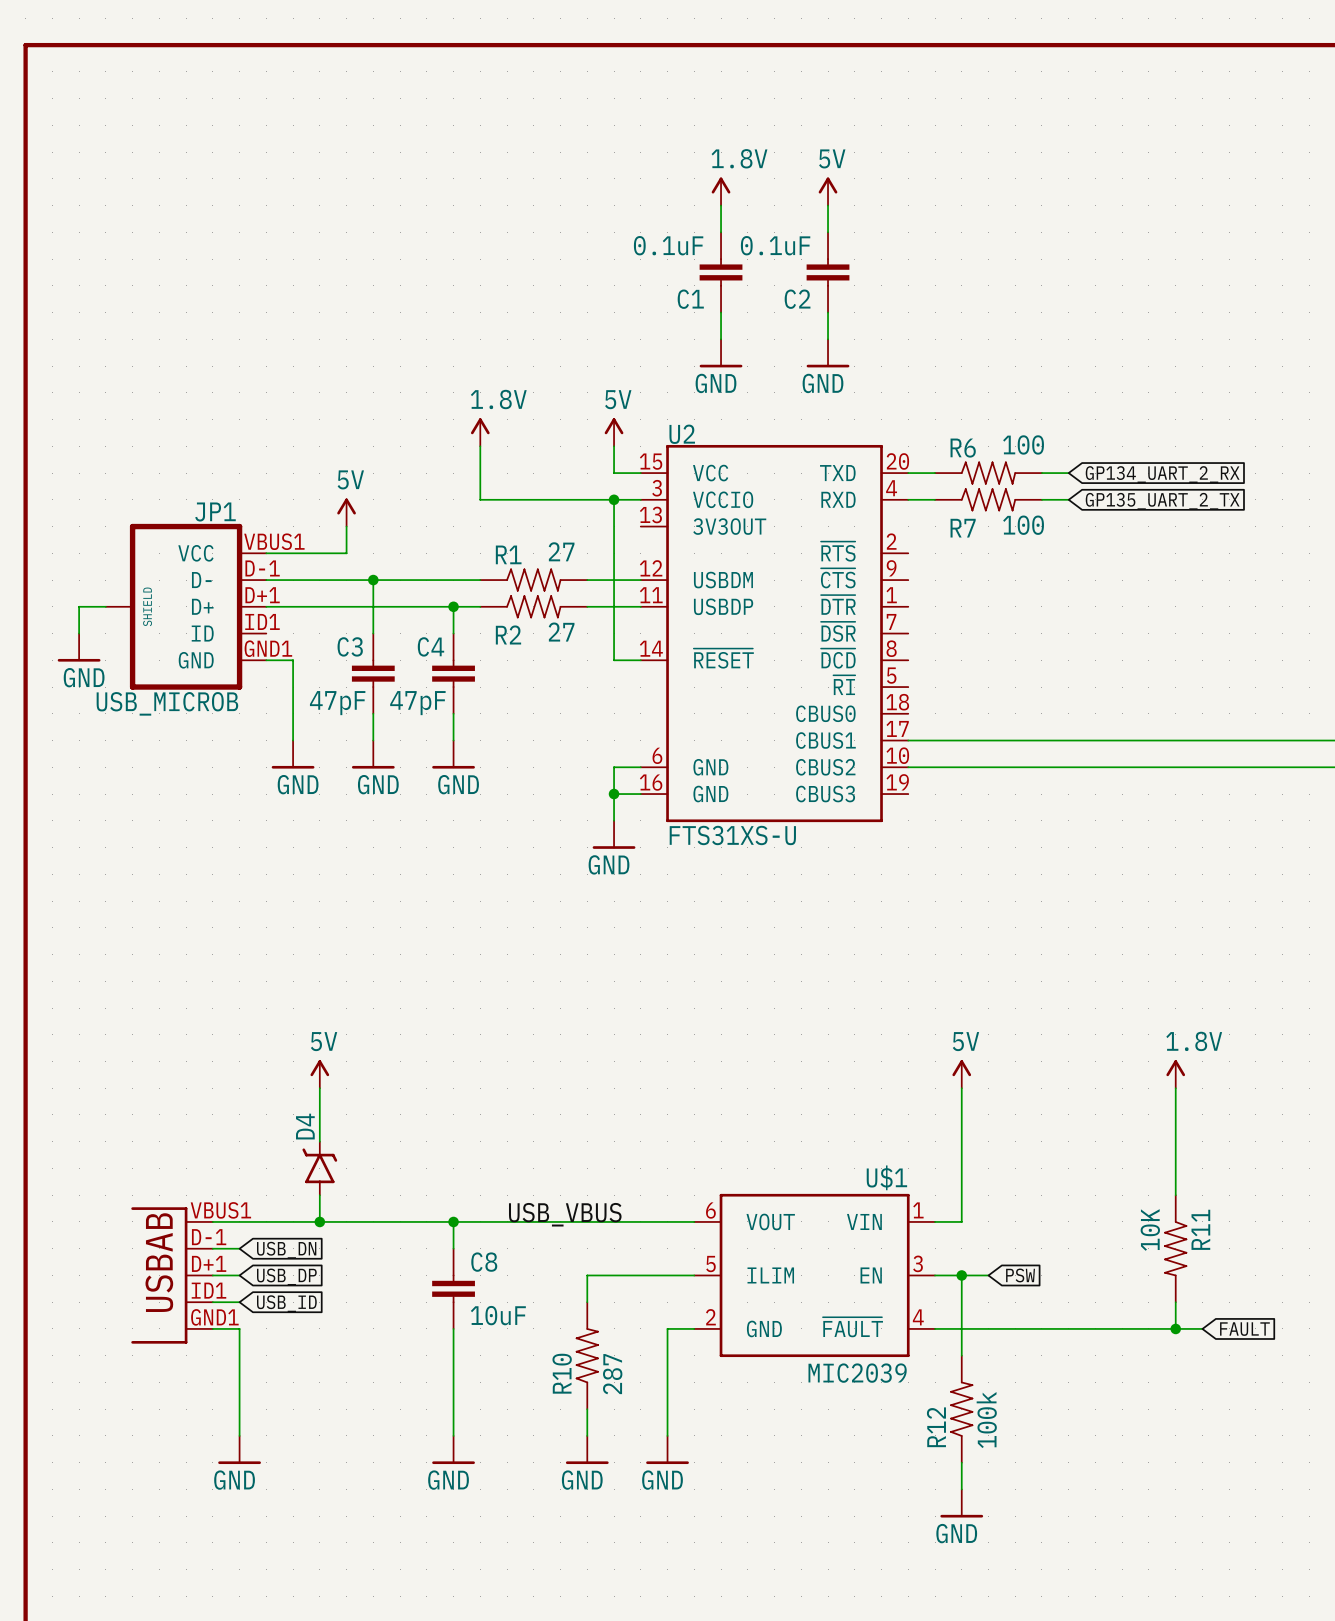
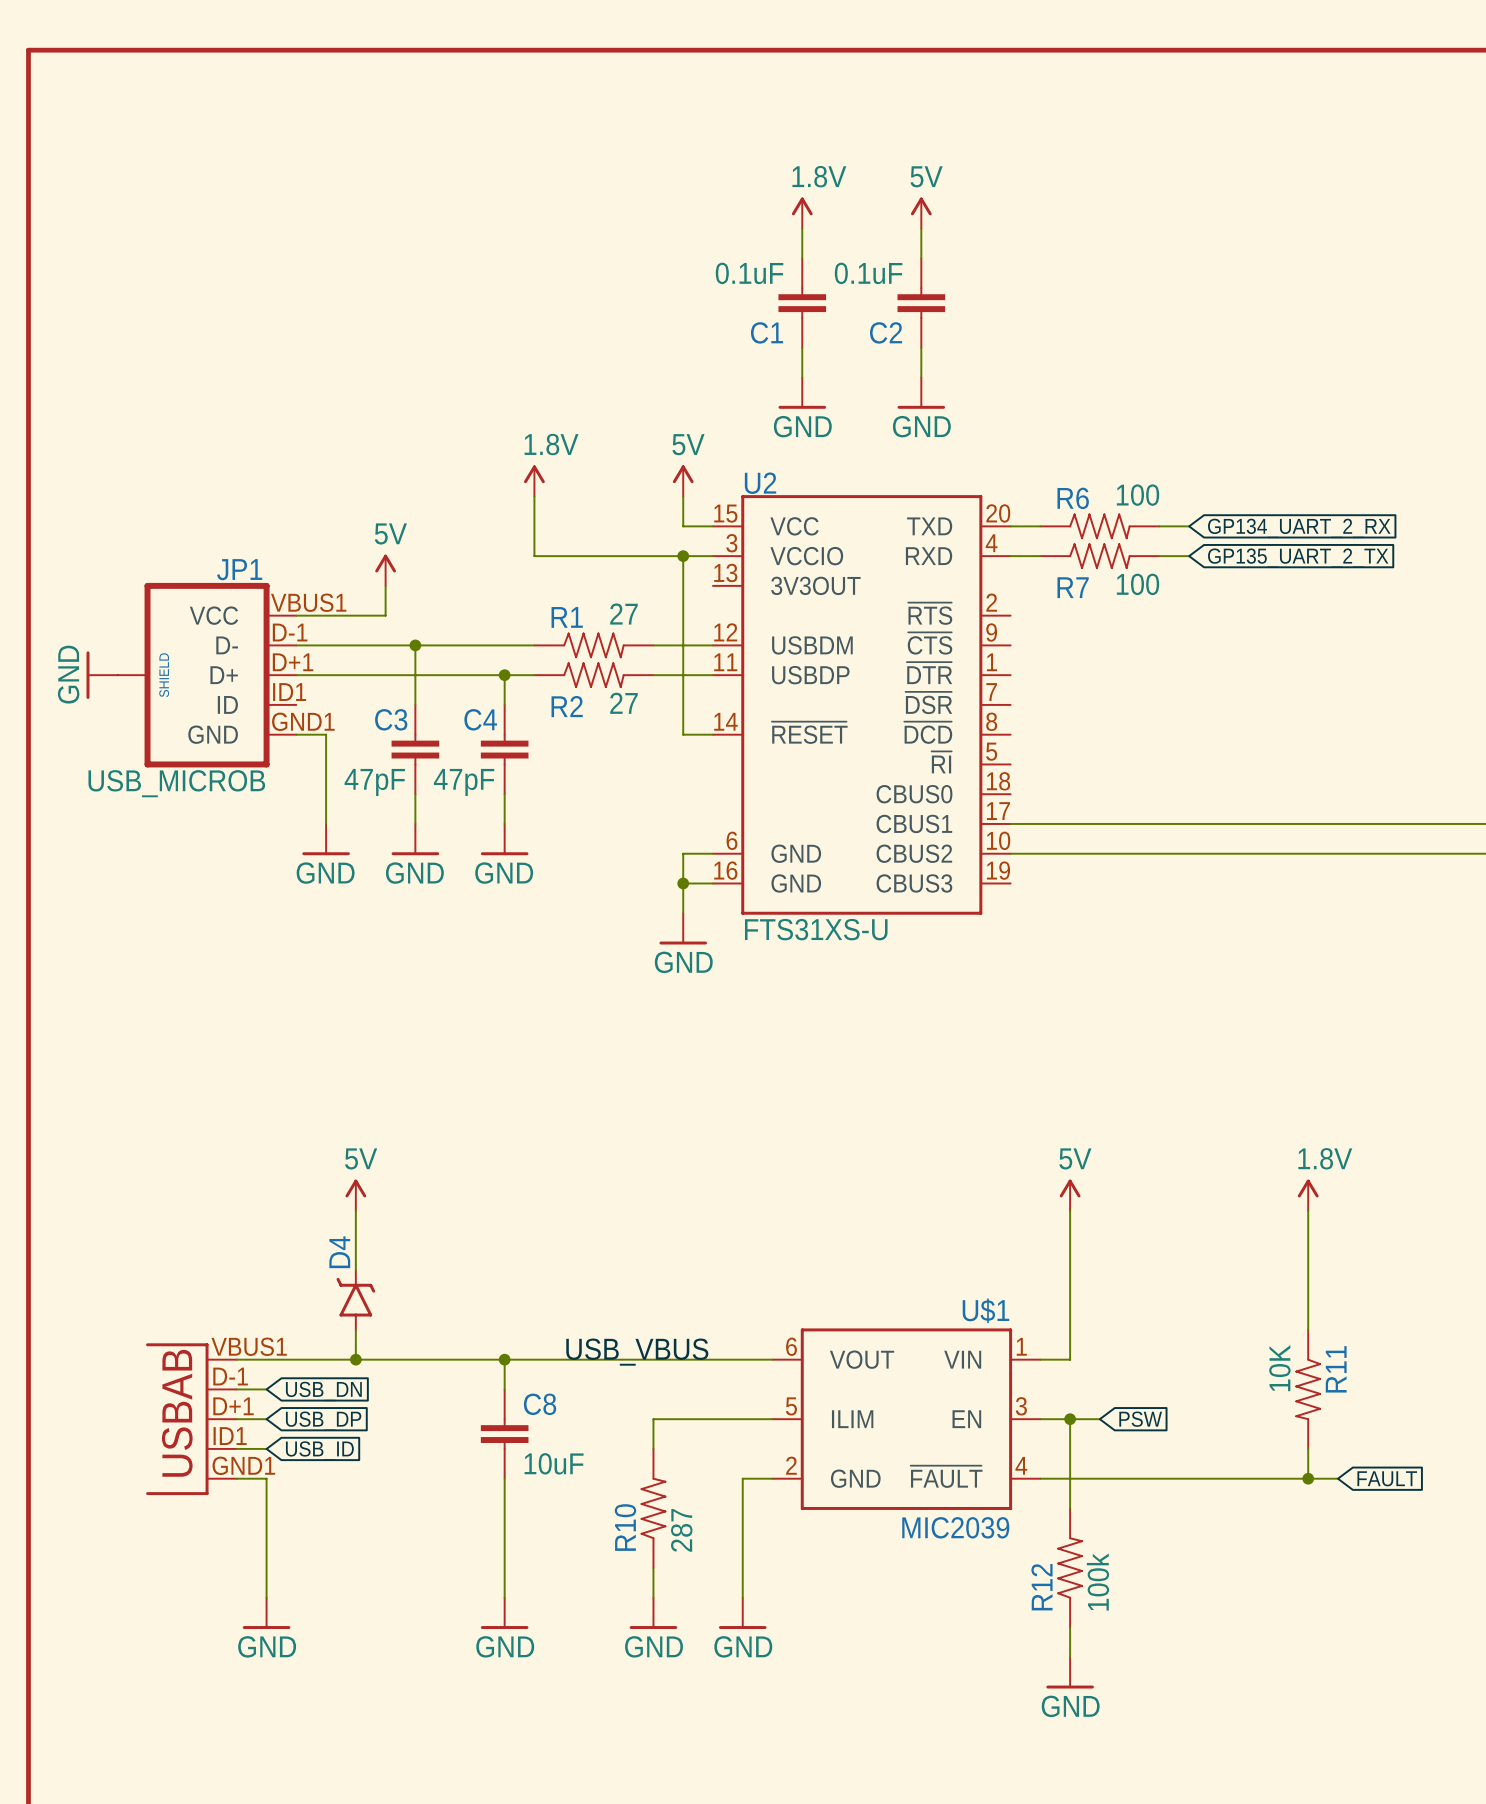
power symbol position: GND (79, 647) -> GND (102, 675)
power symbol rotation: 0° (79, 660) -> 90° clockwise (88, 675)

